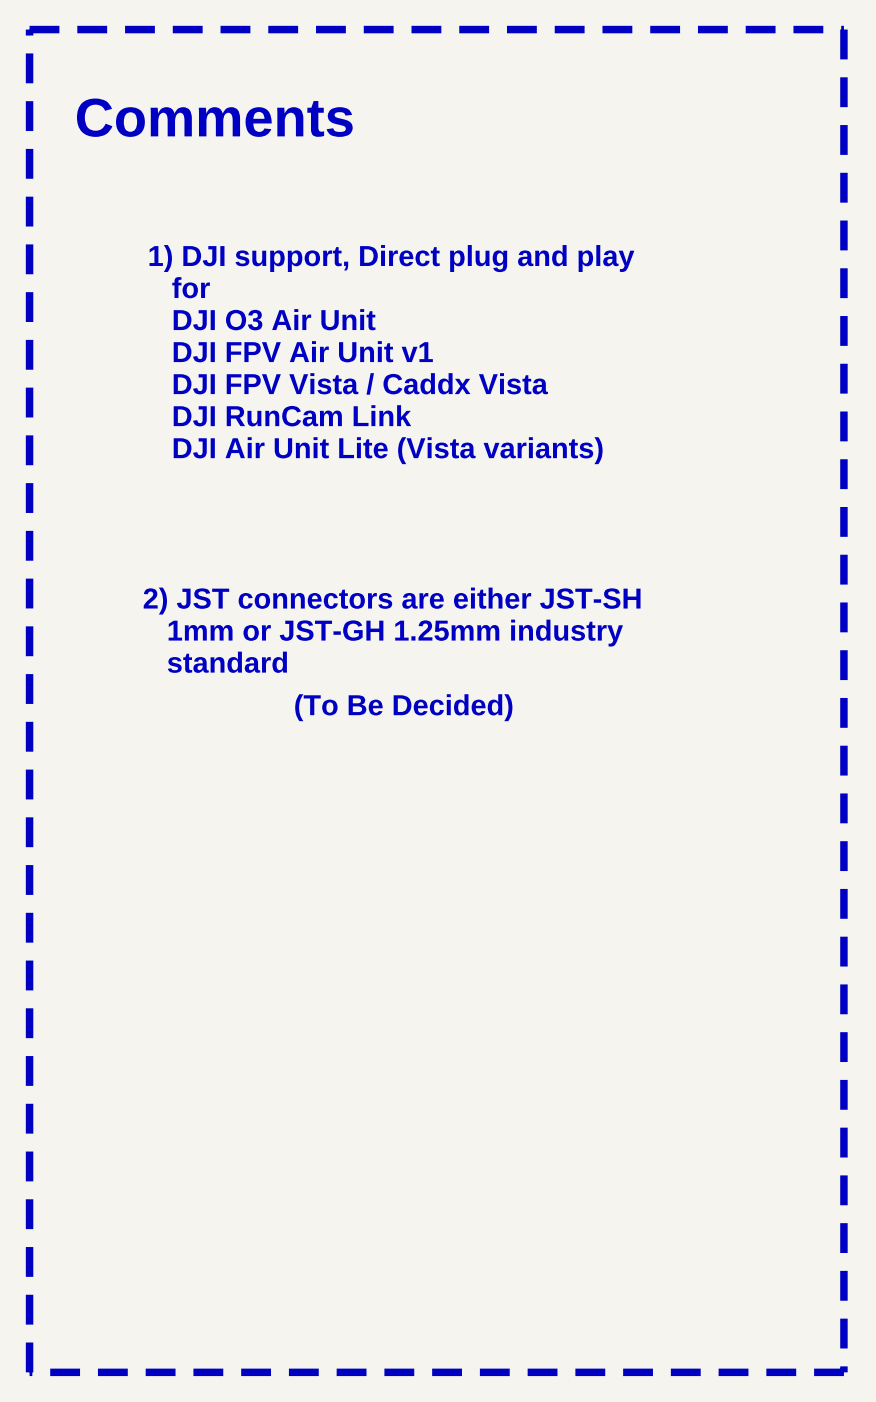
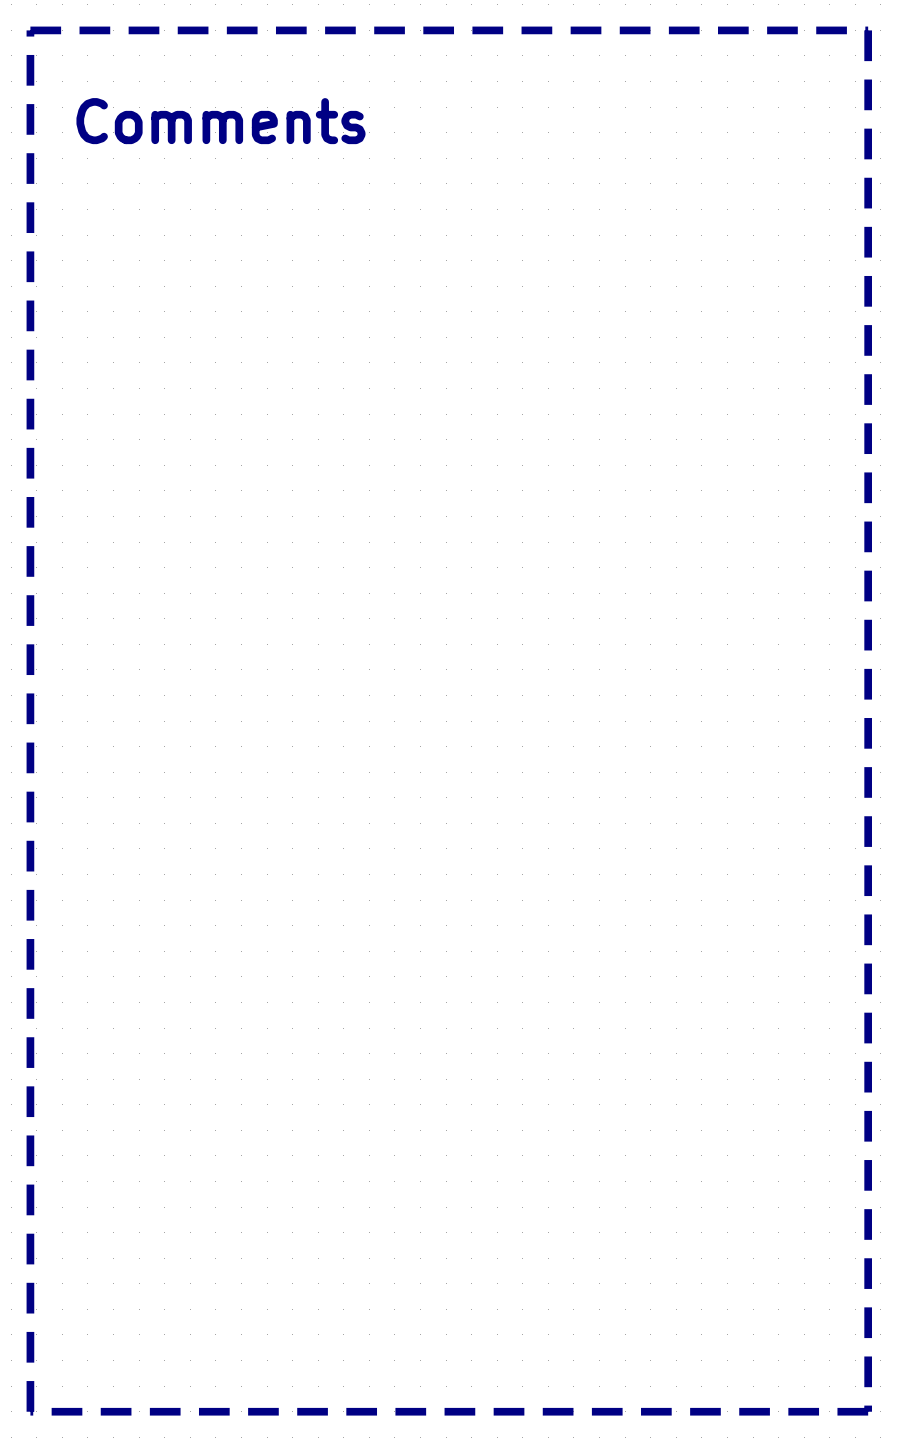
text: 1) DJI support, Direct plug and play (391, 258) -> none
text: for (191, 287) -> none
text: DJI O3 Air Unit (274, 319) -> none
text: DJI FPV Air Unit v1 (303, 351) -> none
text: DJI FPV Vista / Caddx Vista (360, 383) -> none
text: DJI RunCam Link (292, 415) -> none
text: DJI Air Unit Lite (Vista variants) (388, 450) -> none
text: 2) JST connectors are either JST-SH (392, 601) -> none
text: 1mm or JST-GH 1.25mm industry (395, 633) -> none
text: standard (227, 662) -> none
text: (To Be Decided) (403, 707) -> none

